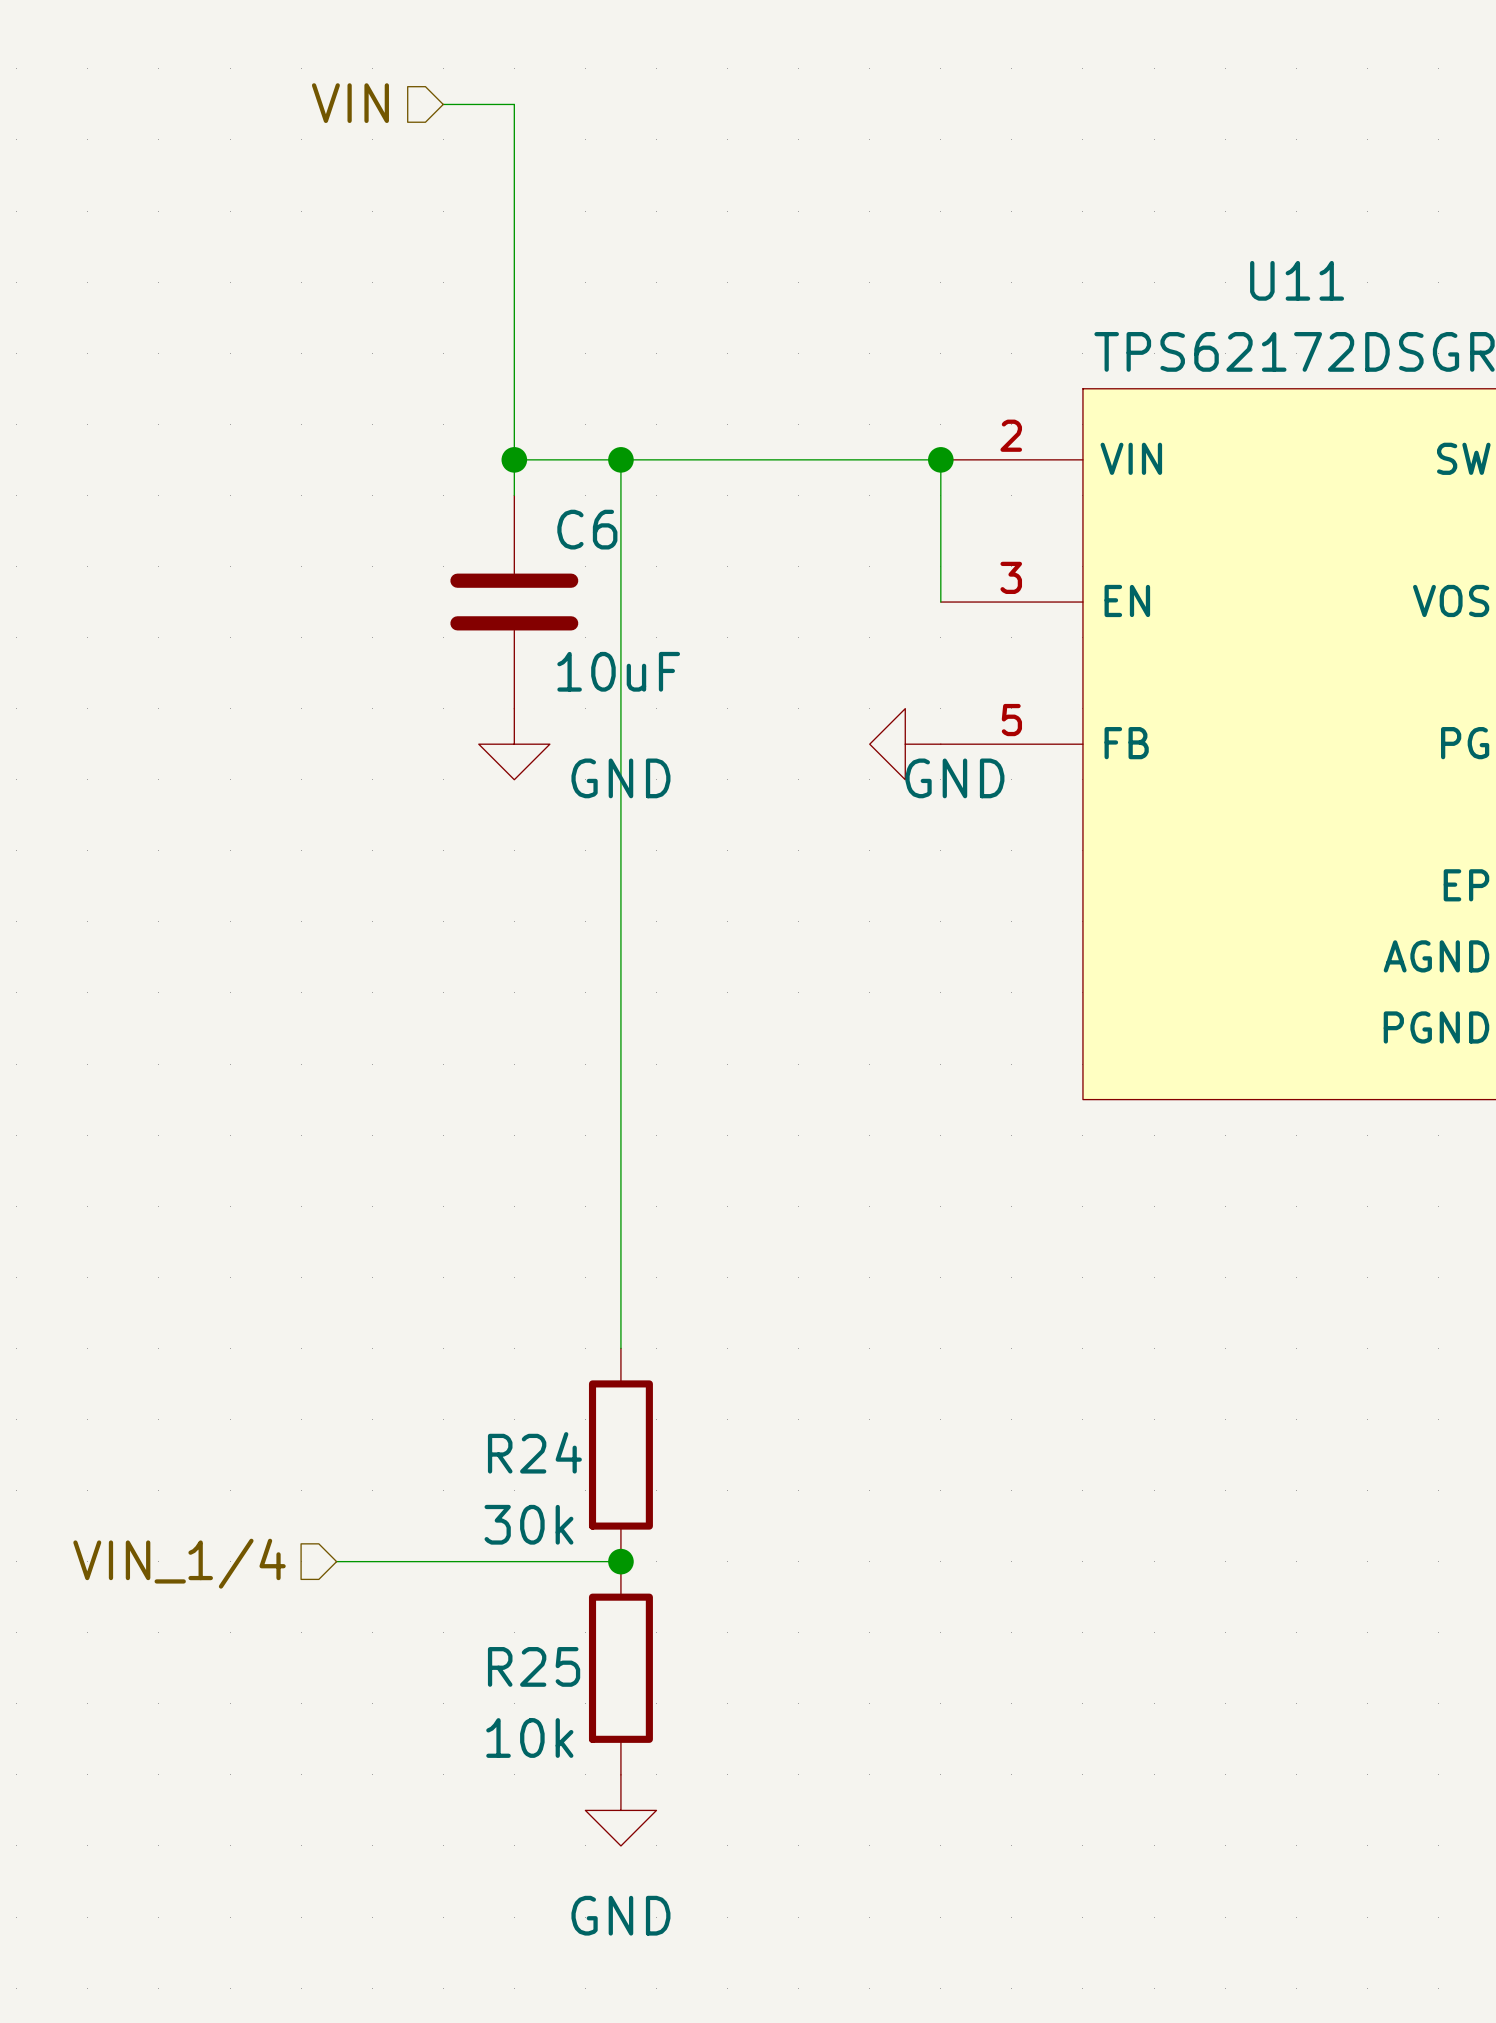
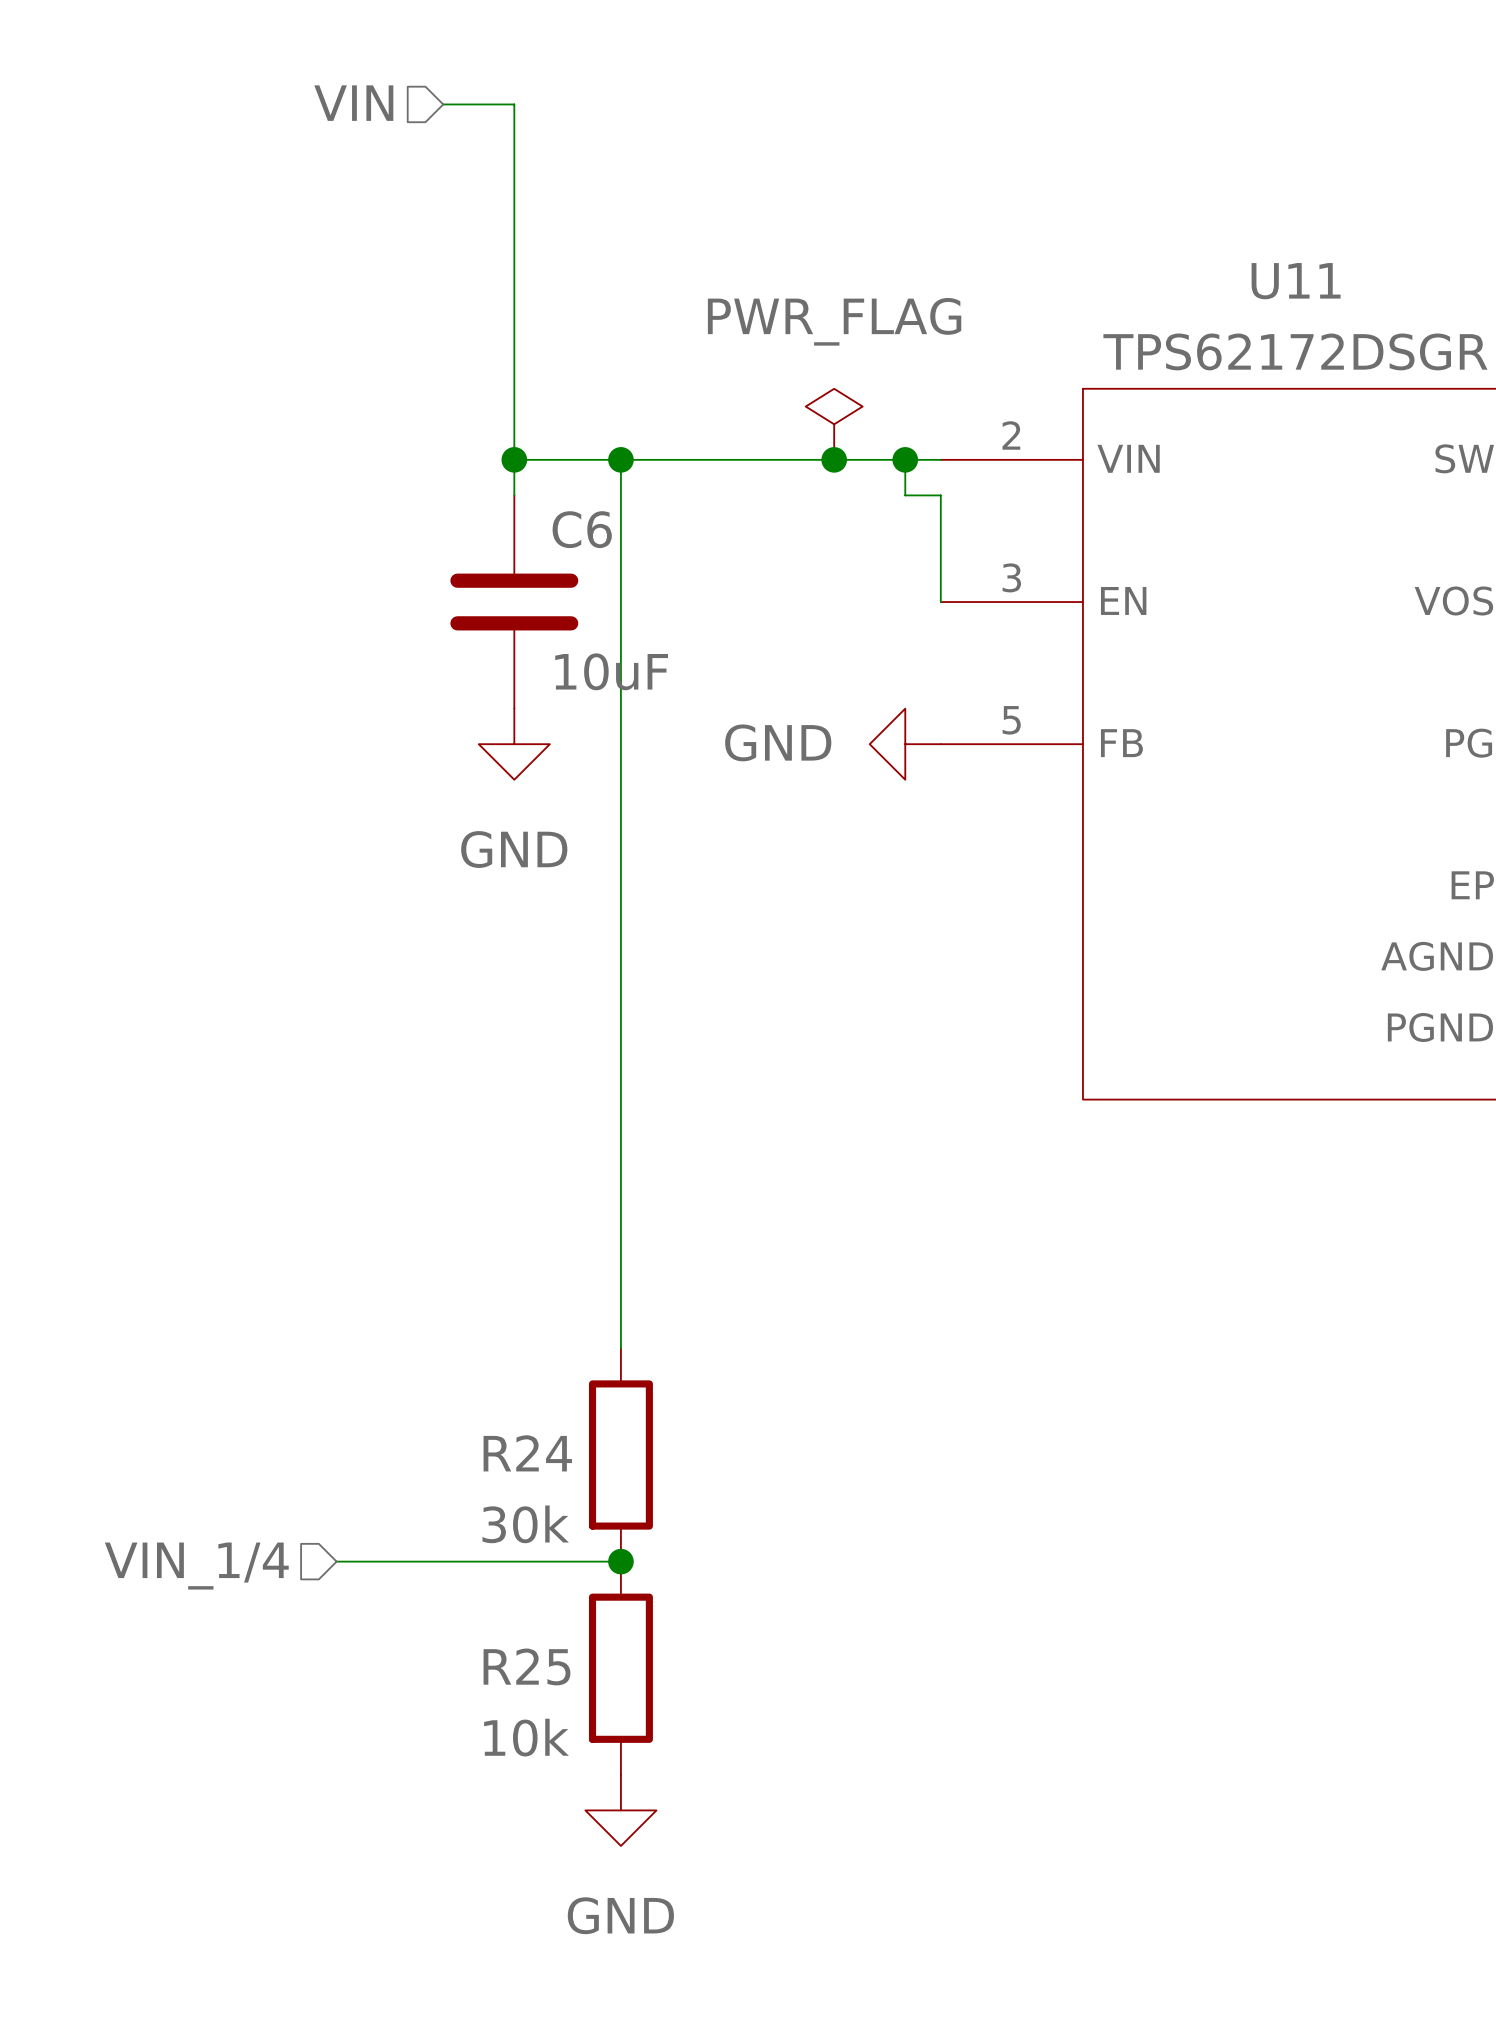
power symbol: none -> PWR_FLAG (834, 424)
junction: none -> (834, 459)
wire: (940, 459) (940, 495) -> (905, 459) (905, 495) (940, 495)
junction position: (940, 459) -> (905, 459)
power symbol text position: GND (620, 778) -> GND (514, 849)
power symbol text position: GND (954, 778) -> GND (778, 742)

